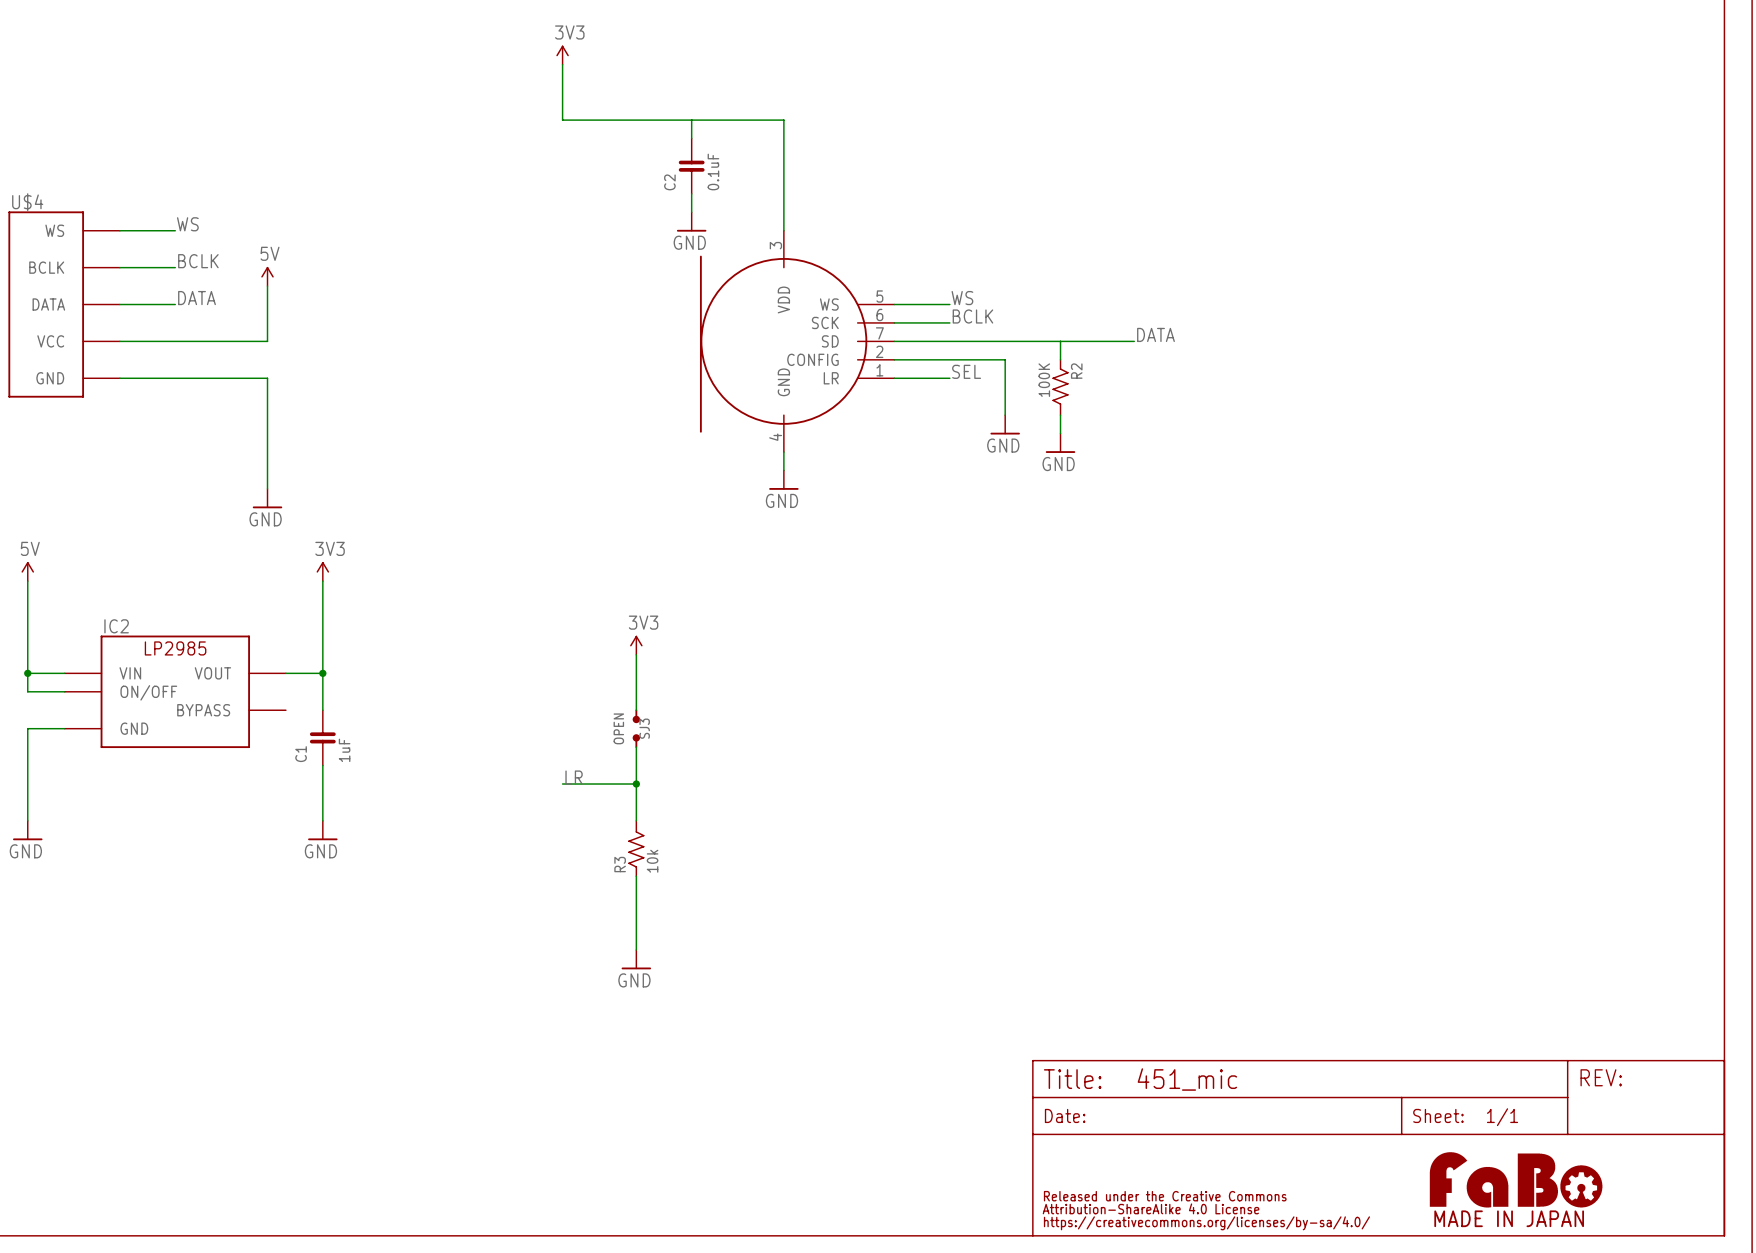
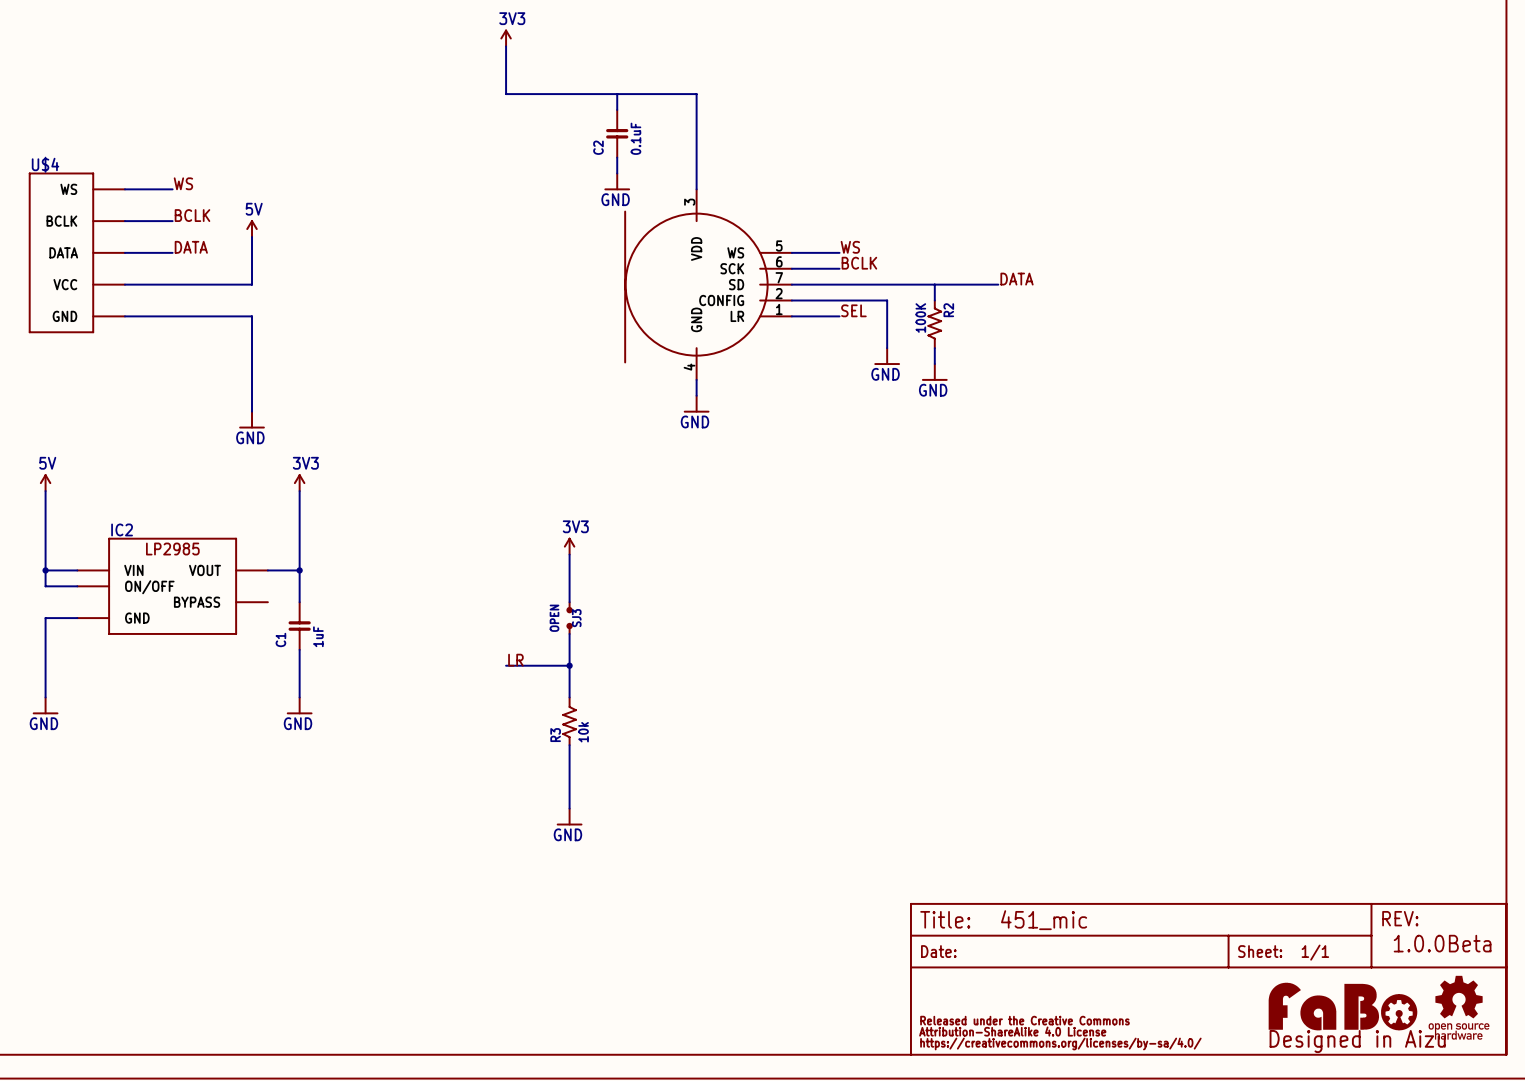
text: none -> 1.0.0Beta (1442, 943)
part: (1516, 1179) -> none
part: none -> (1342, 1006)
part: none -> (1459, 1007)

